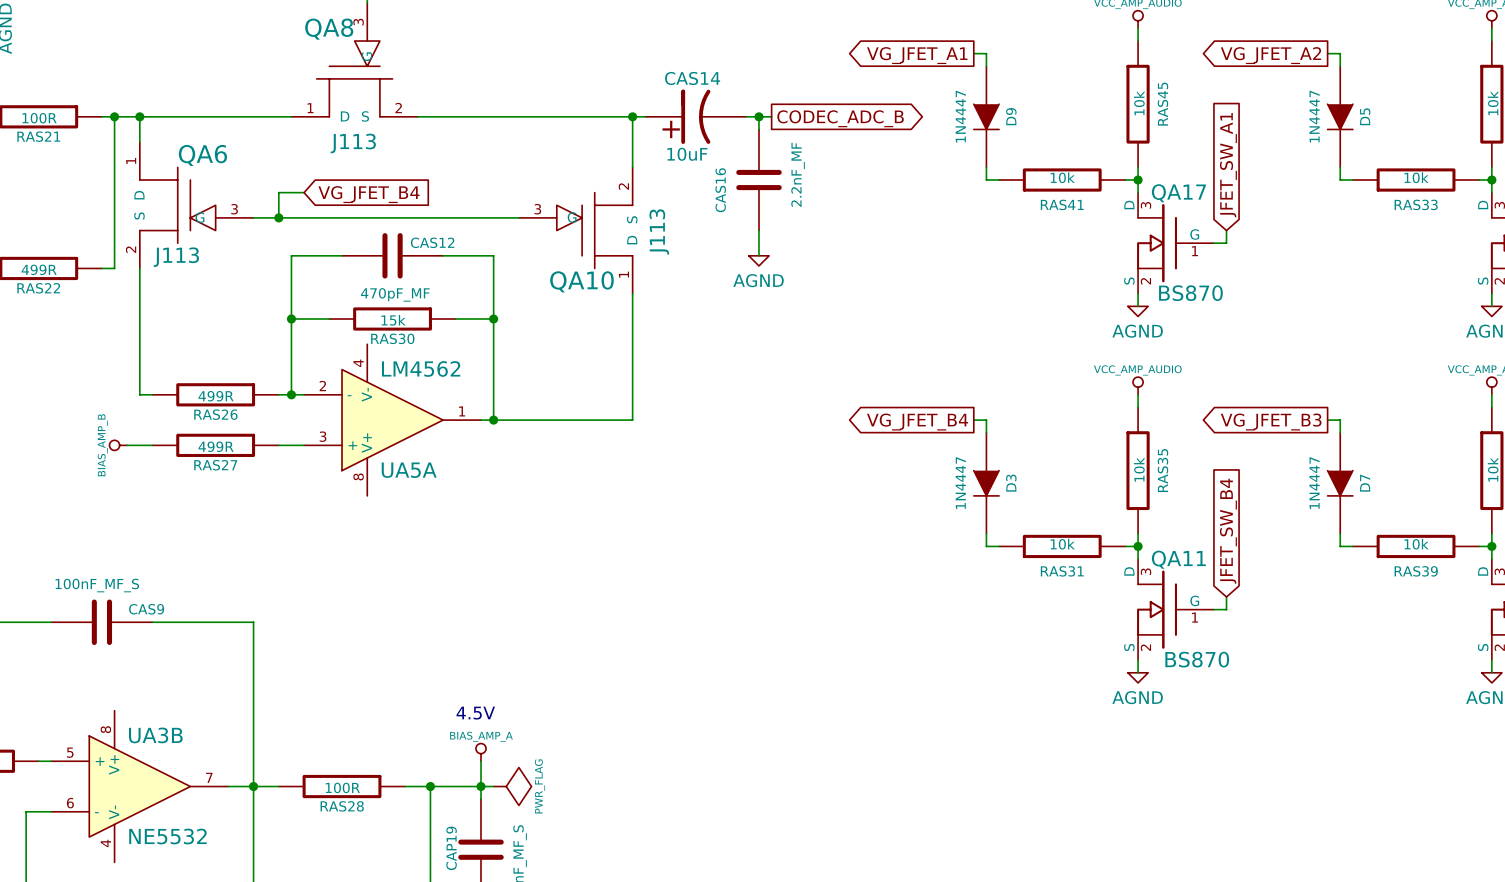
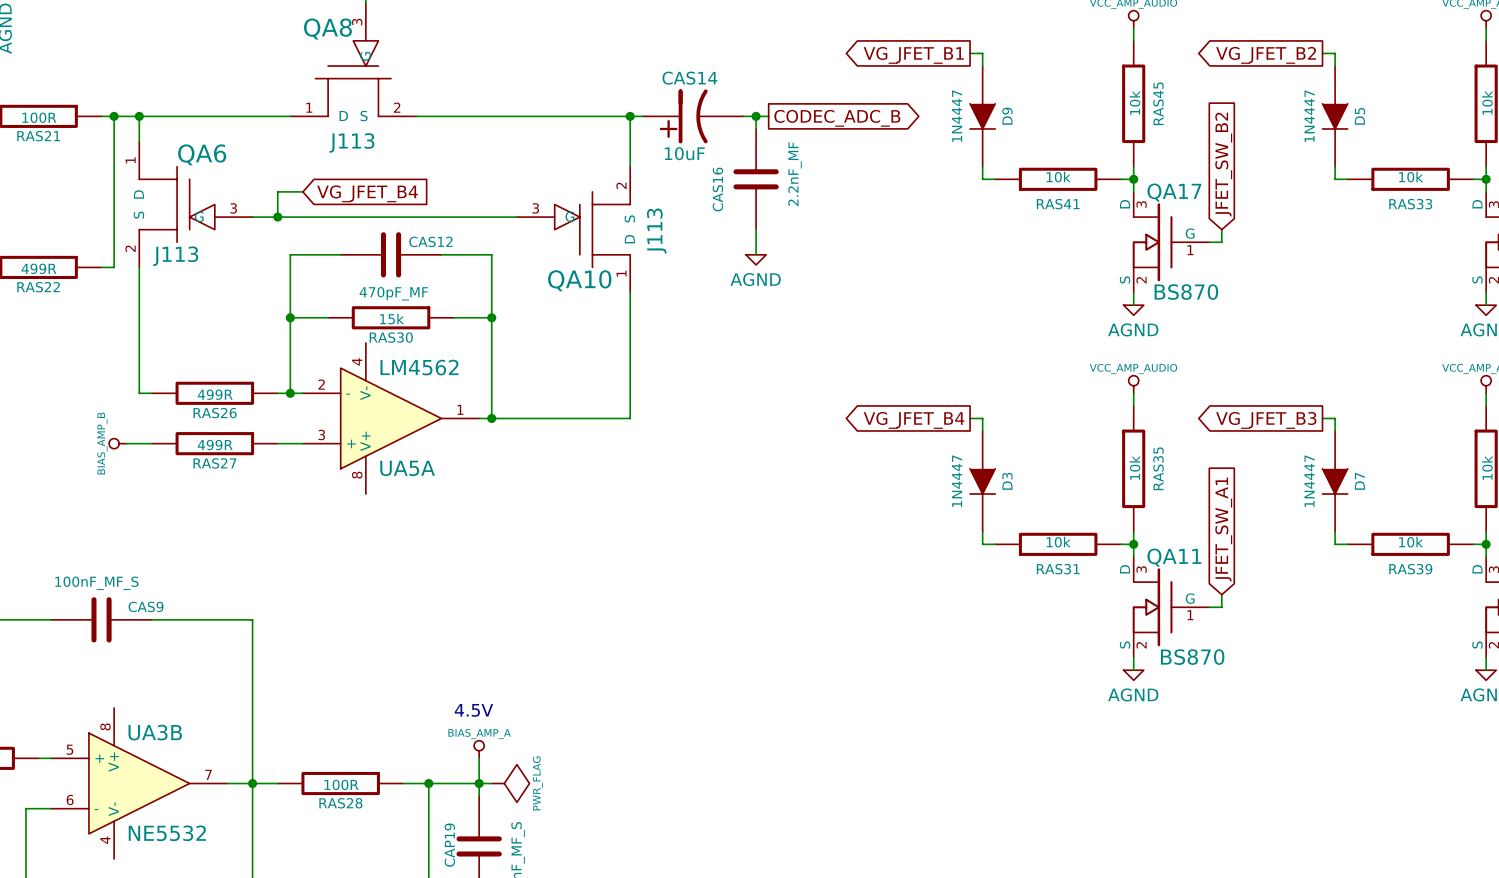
global label: VG_JFET_A1 (917, 55) -> VG_JFET_B1 (913, 55)
global label: VG_JFET_A2 (1271, 55) -> VG_JFET_B2 (1266, 55)
global label: JFET_SW_A1 (1228, 165) -> JFET_SW_B2 (1223, 164)
global label: JFET_SW_B4 (1228, 531) -> JFET_SW_A1 (1223, 529)

